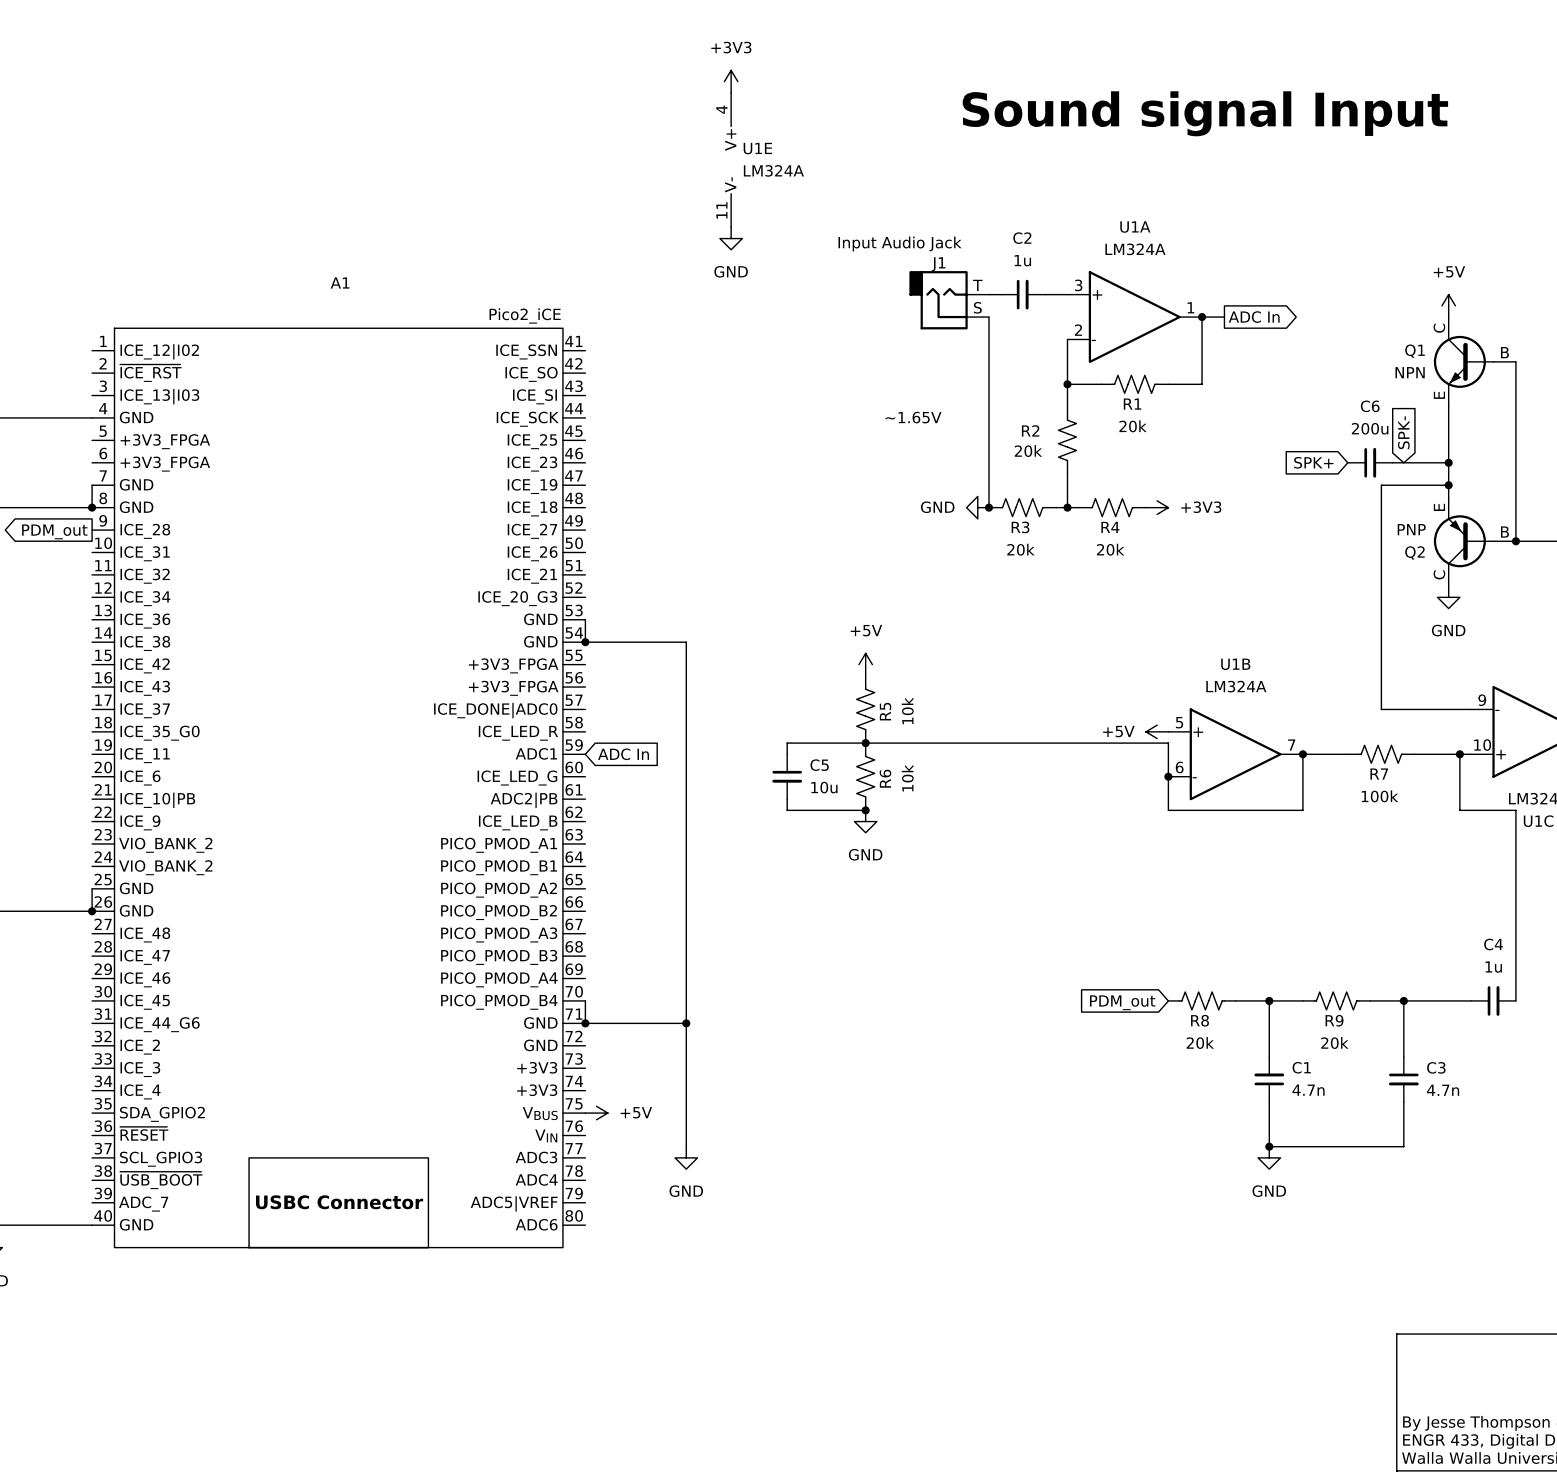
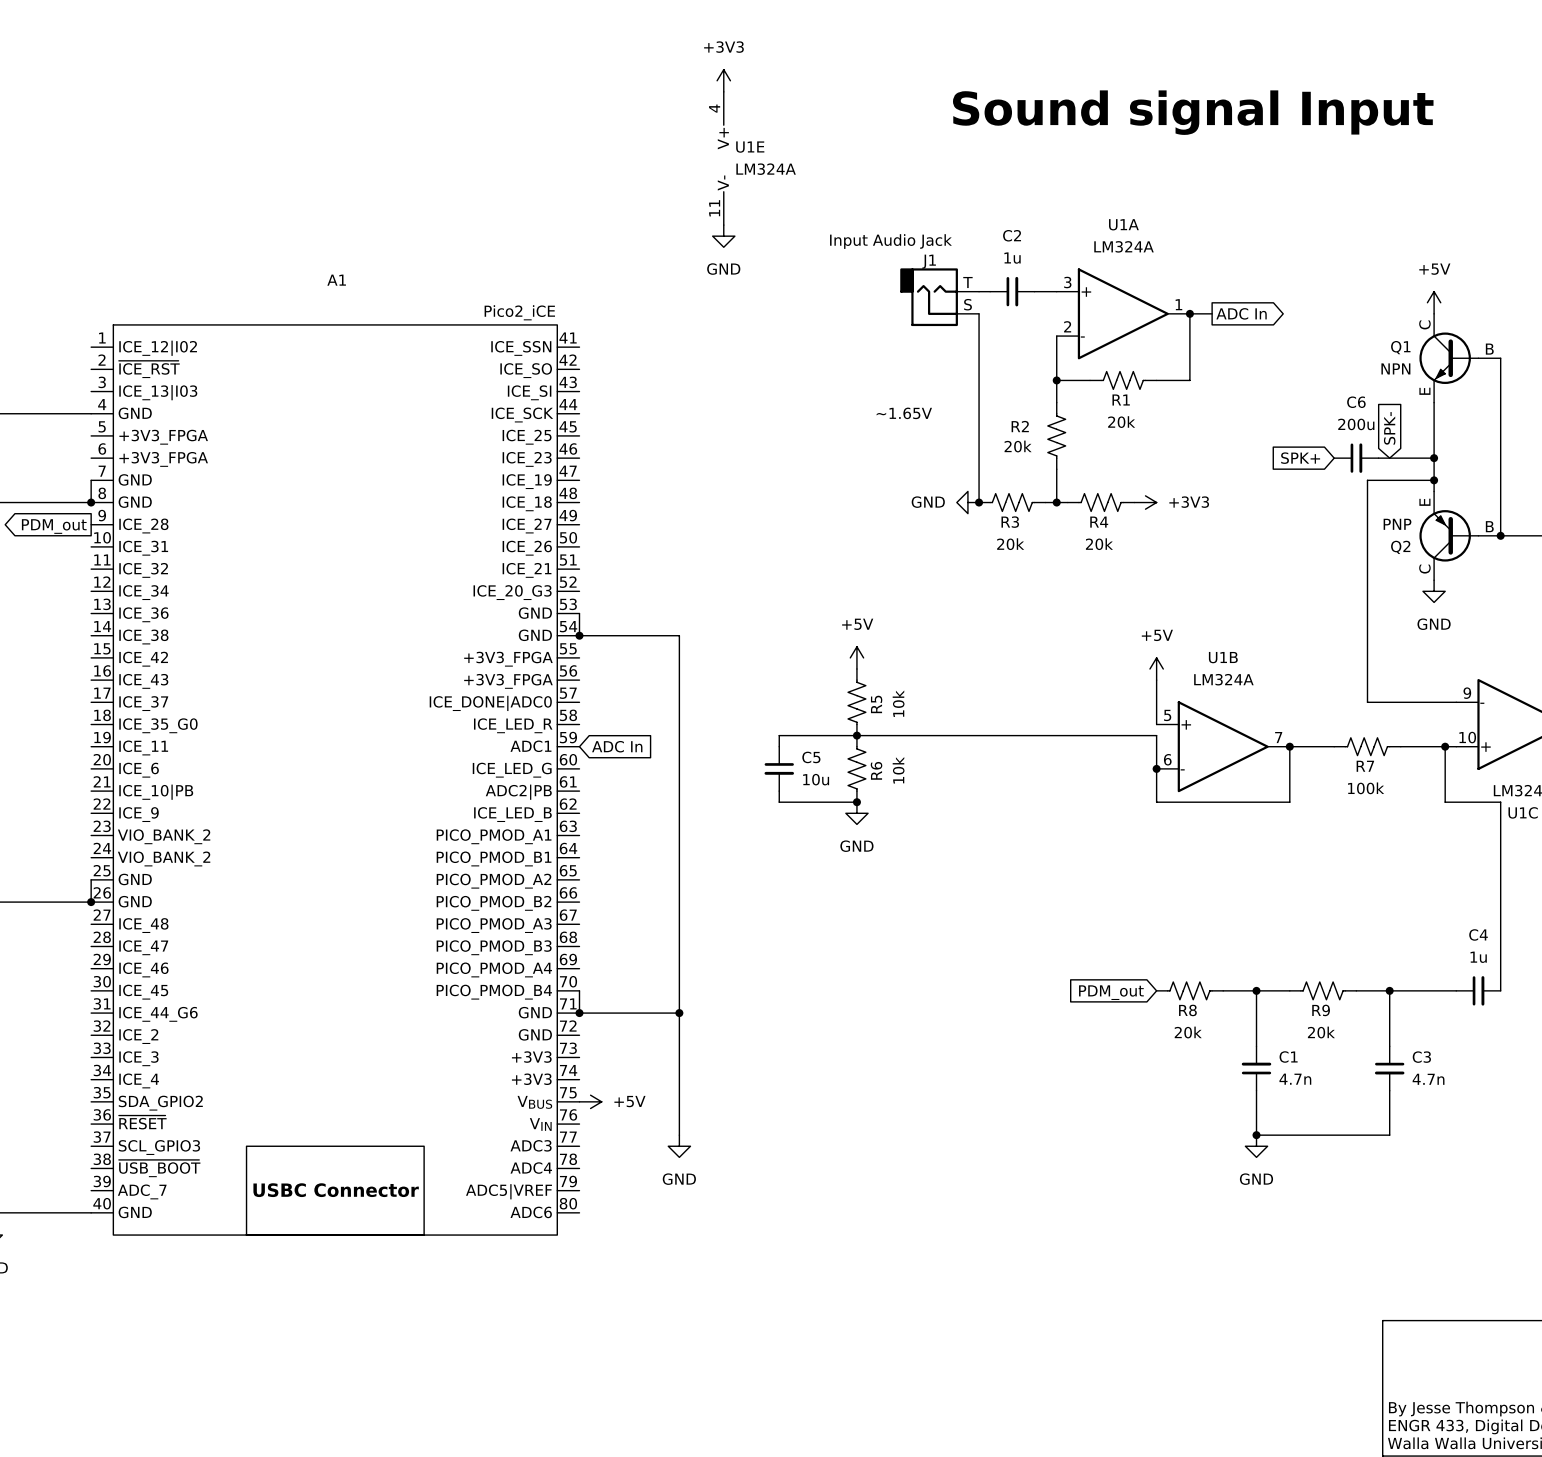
wire: none -> (1156, 680) (1156, 724)
power symbol rotation: 0° (1157, 731) -> 90° clockwise (1156, 669)
power symbol position: +5V (1157, 731) -> +5V (1156, 669)

